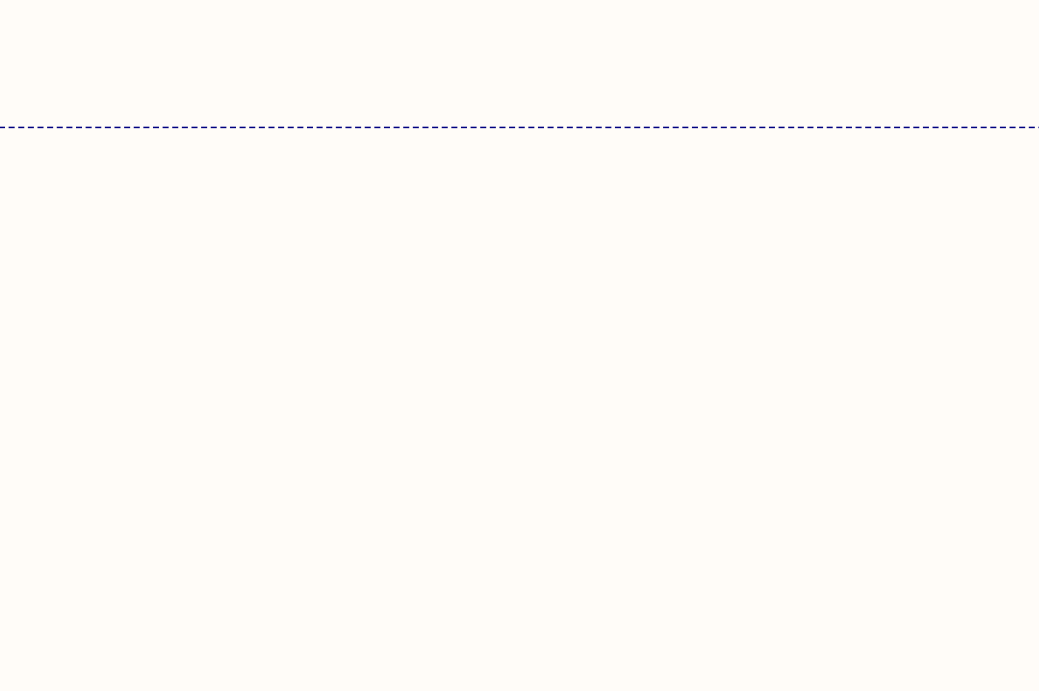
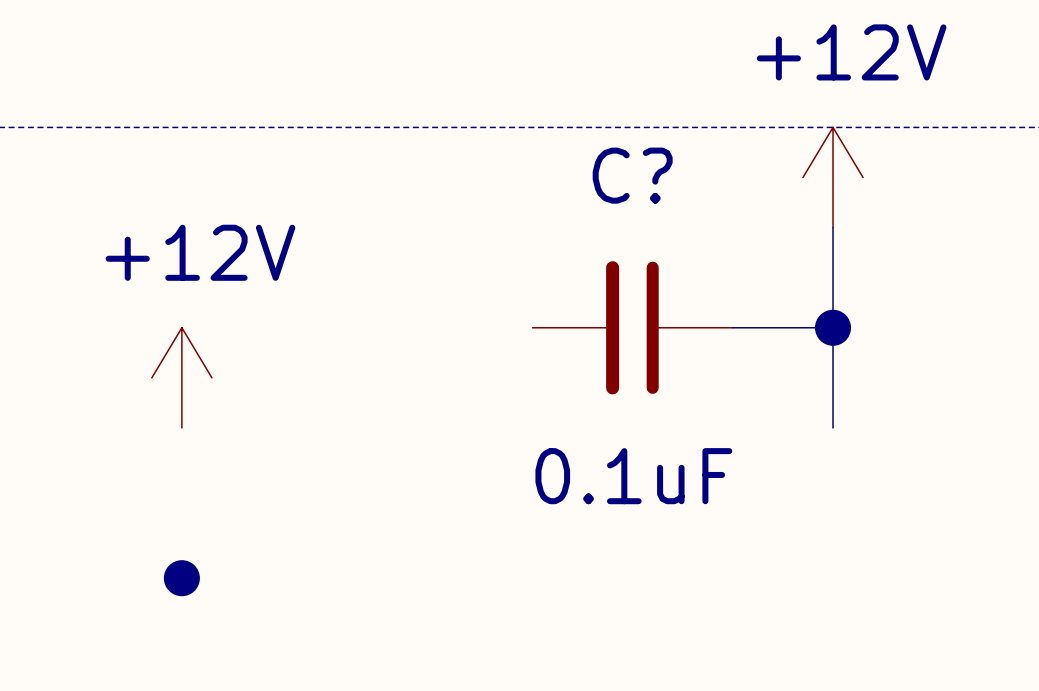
power symbol: none -> +12V (833, 177)
wire: none -> (833, 227) (833, 427)
C?: none -> 0.1uF (632, 327)
wire: none -> (732, 327) (833, 327)
junction: none -> (833, 327)
power symbol: none -> +12V (181, 377)
junction: none -> (181, 578)

